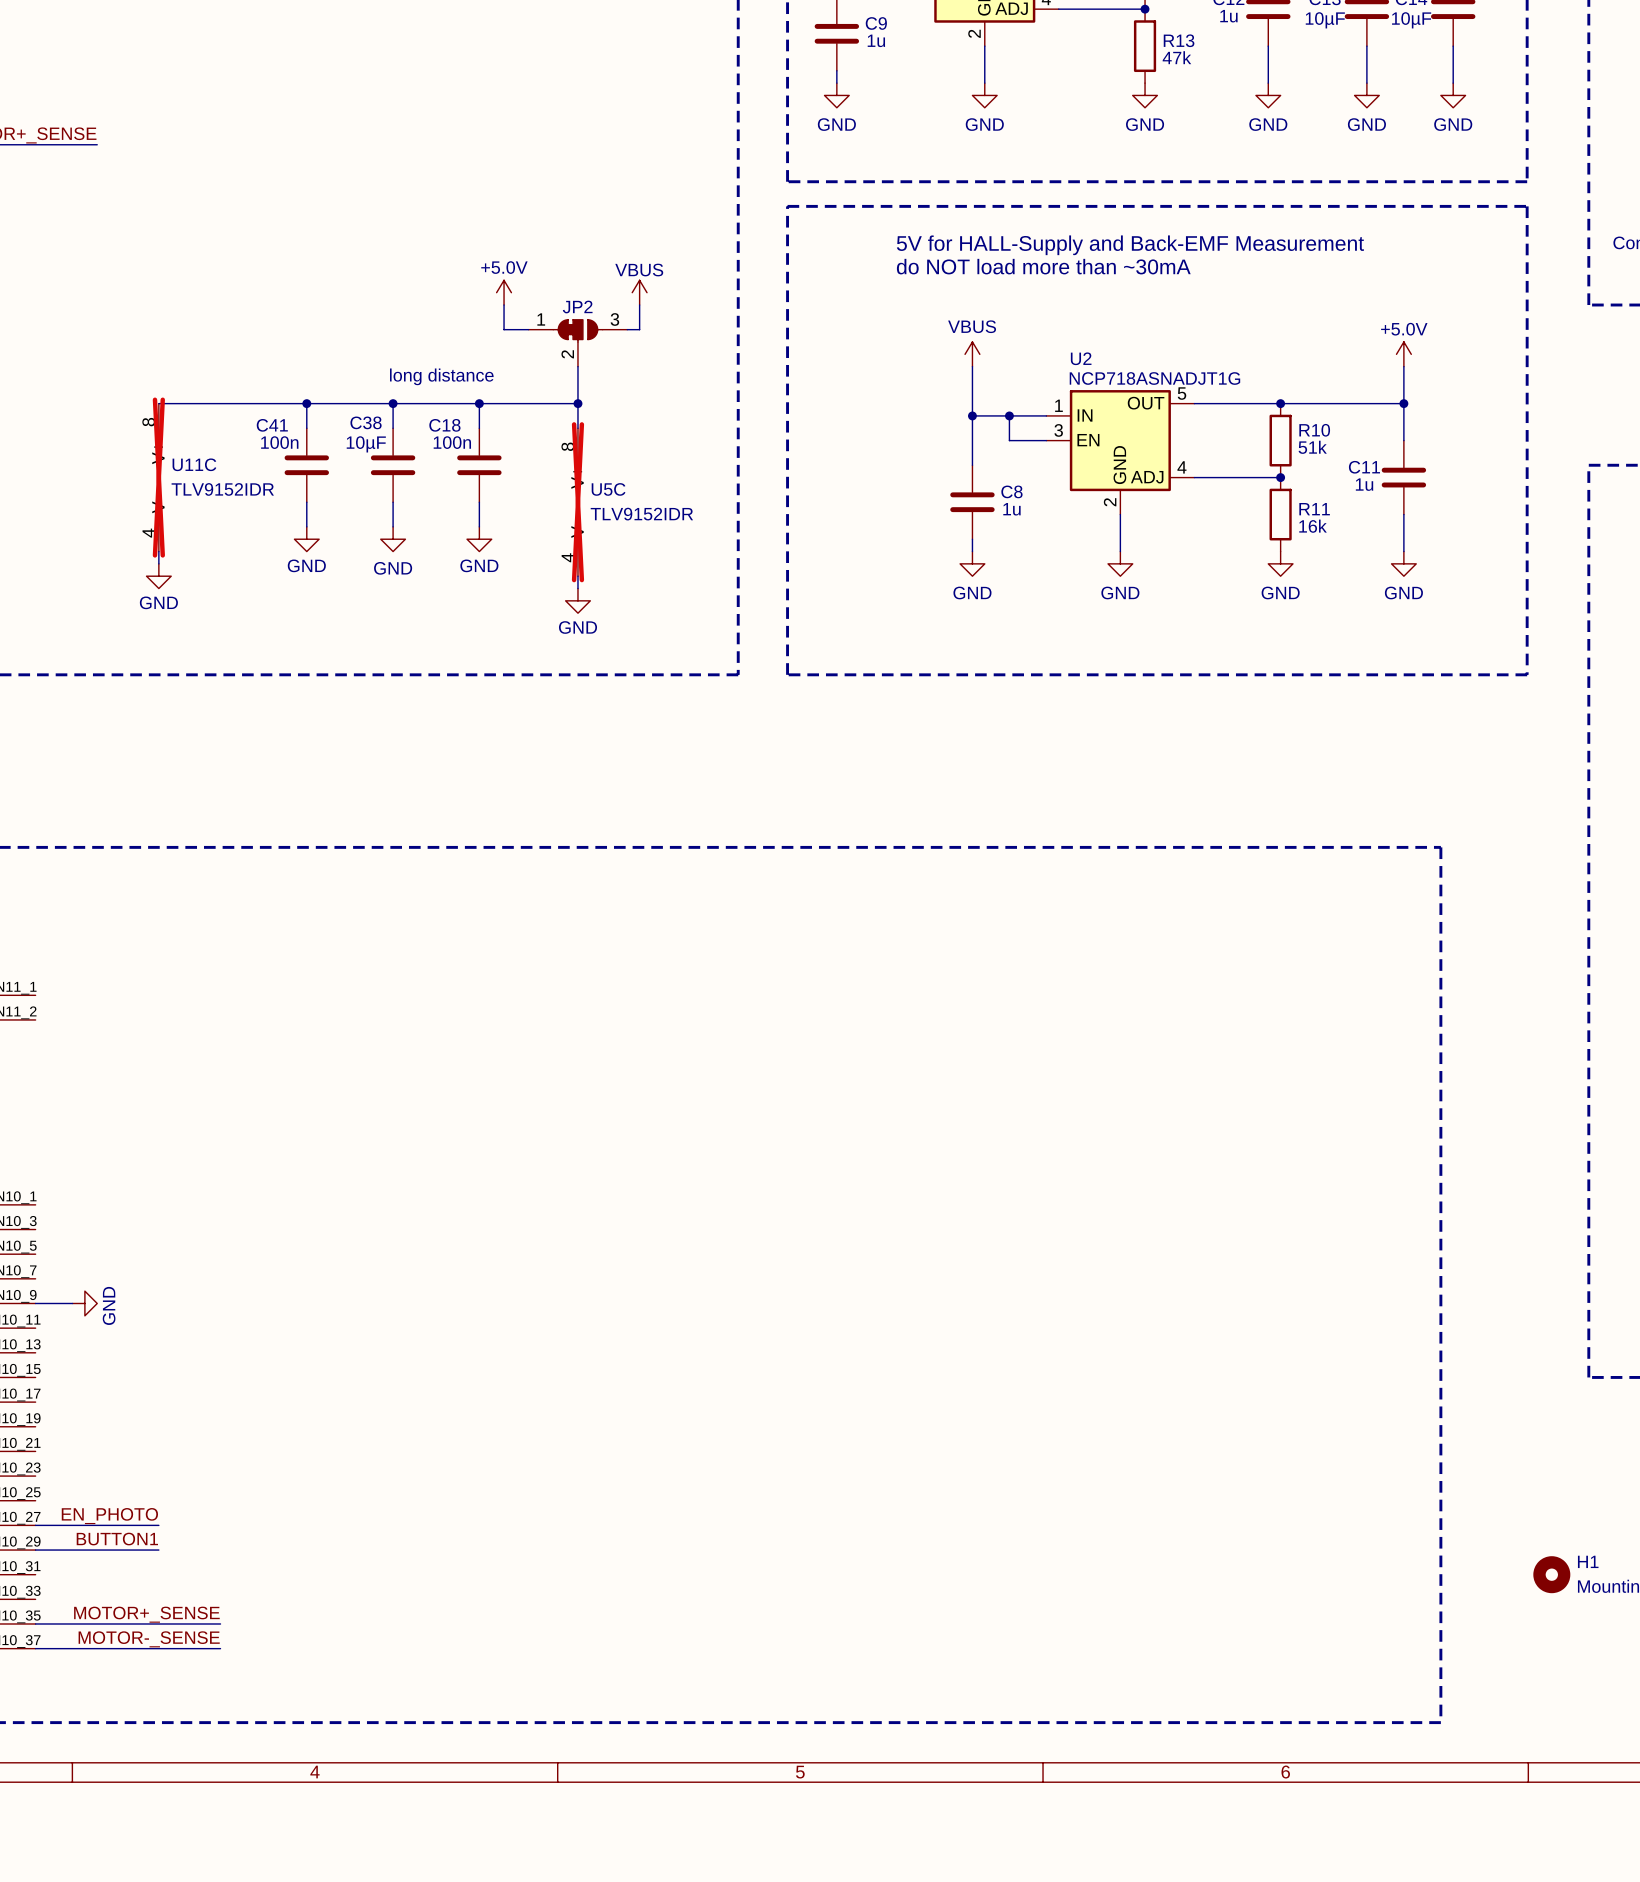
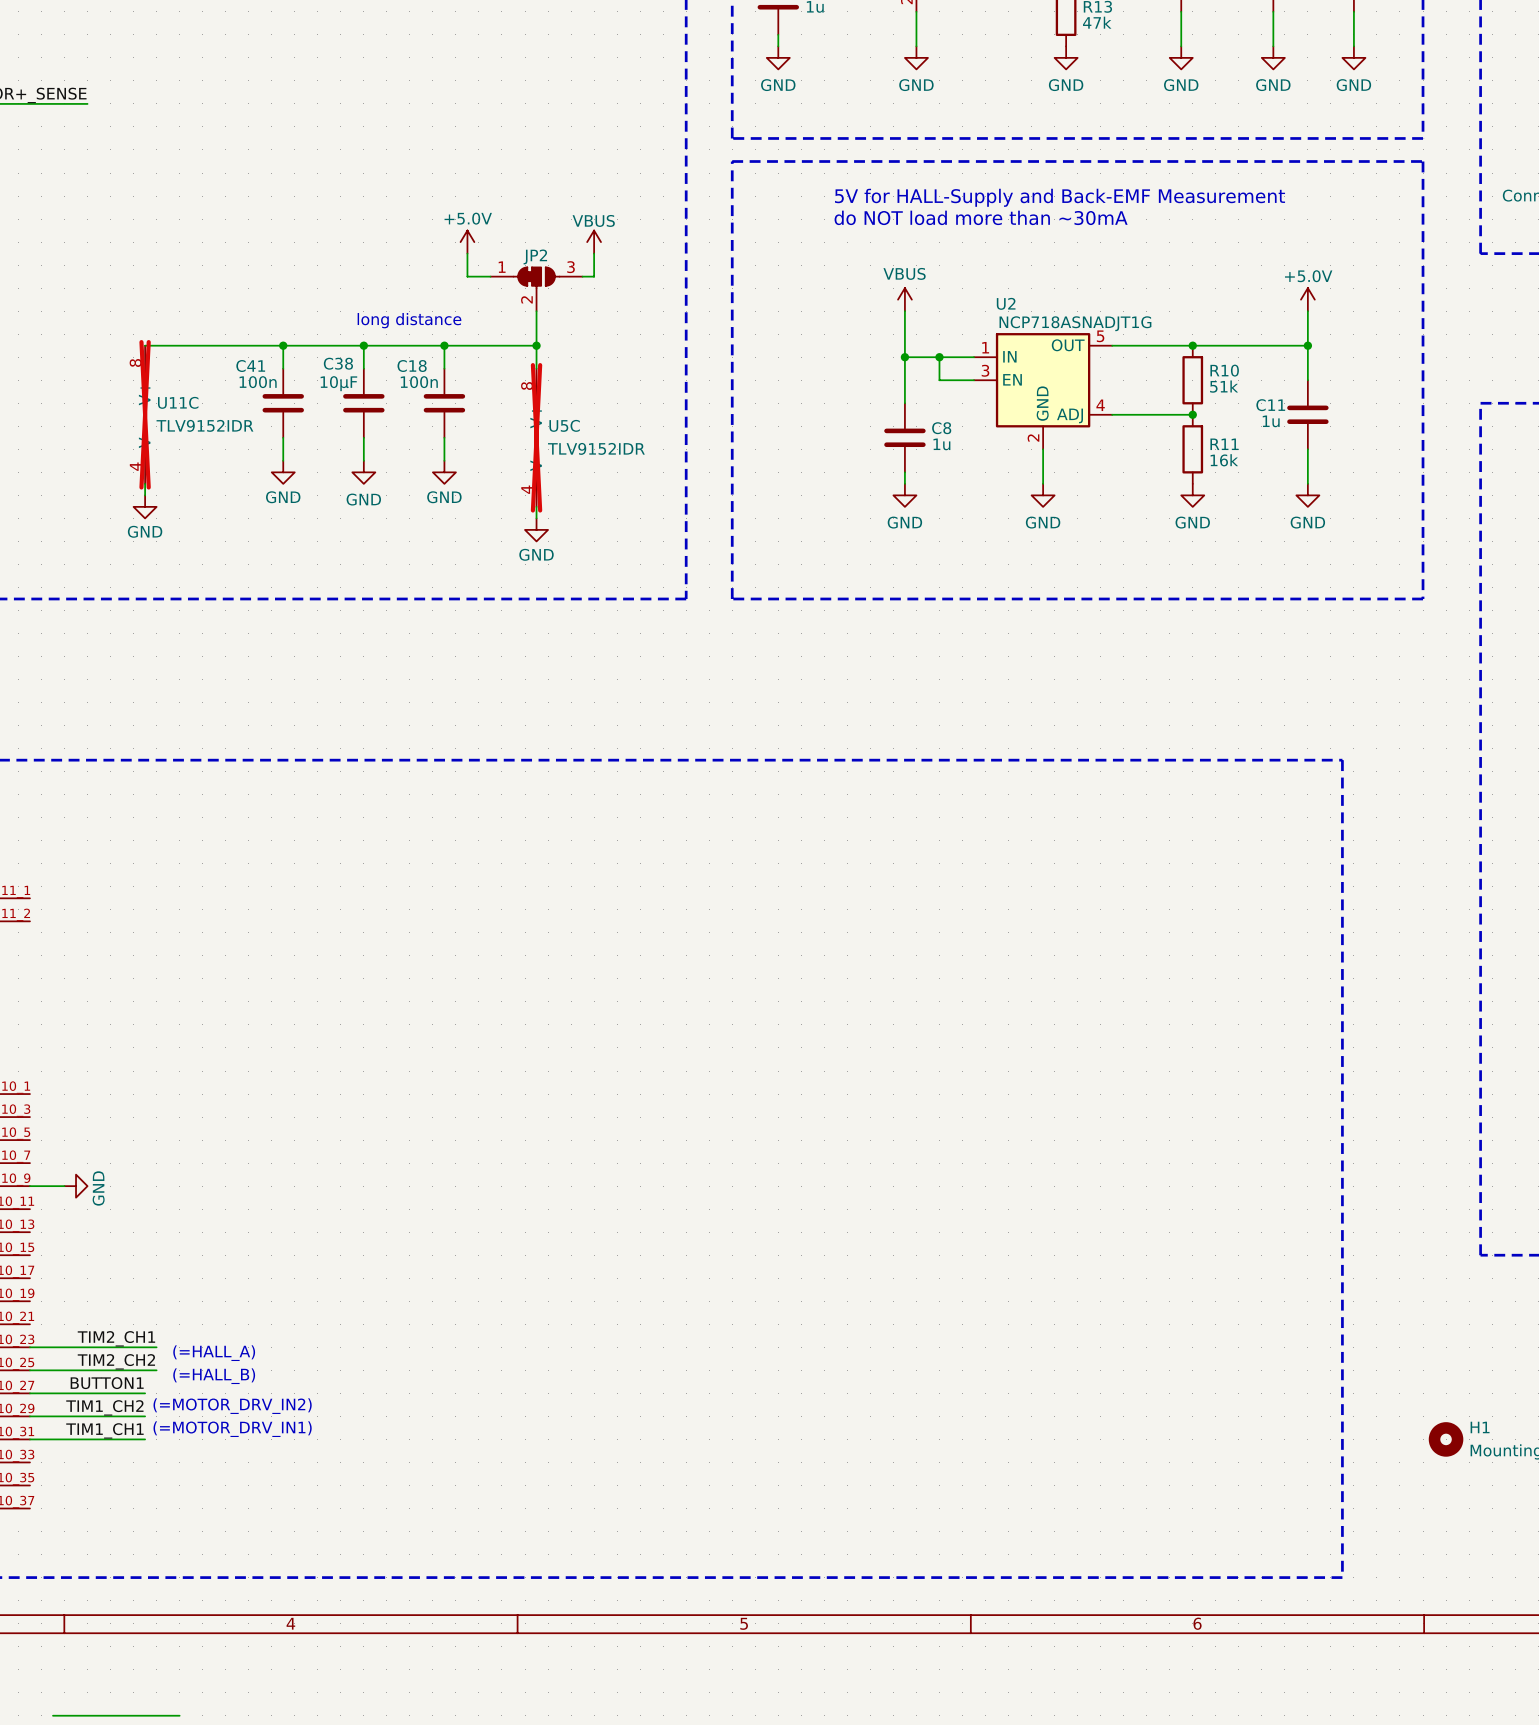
label: none -> TIM2_CH1 (116, 1338)
wire: none -> (29, 1347) (156, 1347)
text: none -> (=HALL_A) (214, 1353)
label: none -> TIM2_CH2 (116, 1361)
wire: none -> (29, 1370) (156, 1370)
text: none -> (=HALL_B) (214, 1376)
label: EN_PHOTO (109, 1516) -> BUTTON1 (107, 1383)
text: none -> (=MOTOR_DRV_IN2) (232, 1406)
label: BUTTON1 (117, 1539) -> TIM1_CH2 (104, 1407)
text: none -> (=MOTOR_DRV_IN1) (232, 1429)
label: none -> TIM1_CH1 (104, 1430)
wire: none -> (29, 1439) (145, 1439)
label: MOTOR+_SENSE (146, 1614) -> none
wire: (35, 1623) (220, 1623) -> none
label: MOTOR-_SENSE (149, 1639) -> none
wire: (35, 1648) (220, 1648) -> none
wire: none -> (52, 1715) (179, 1715)

